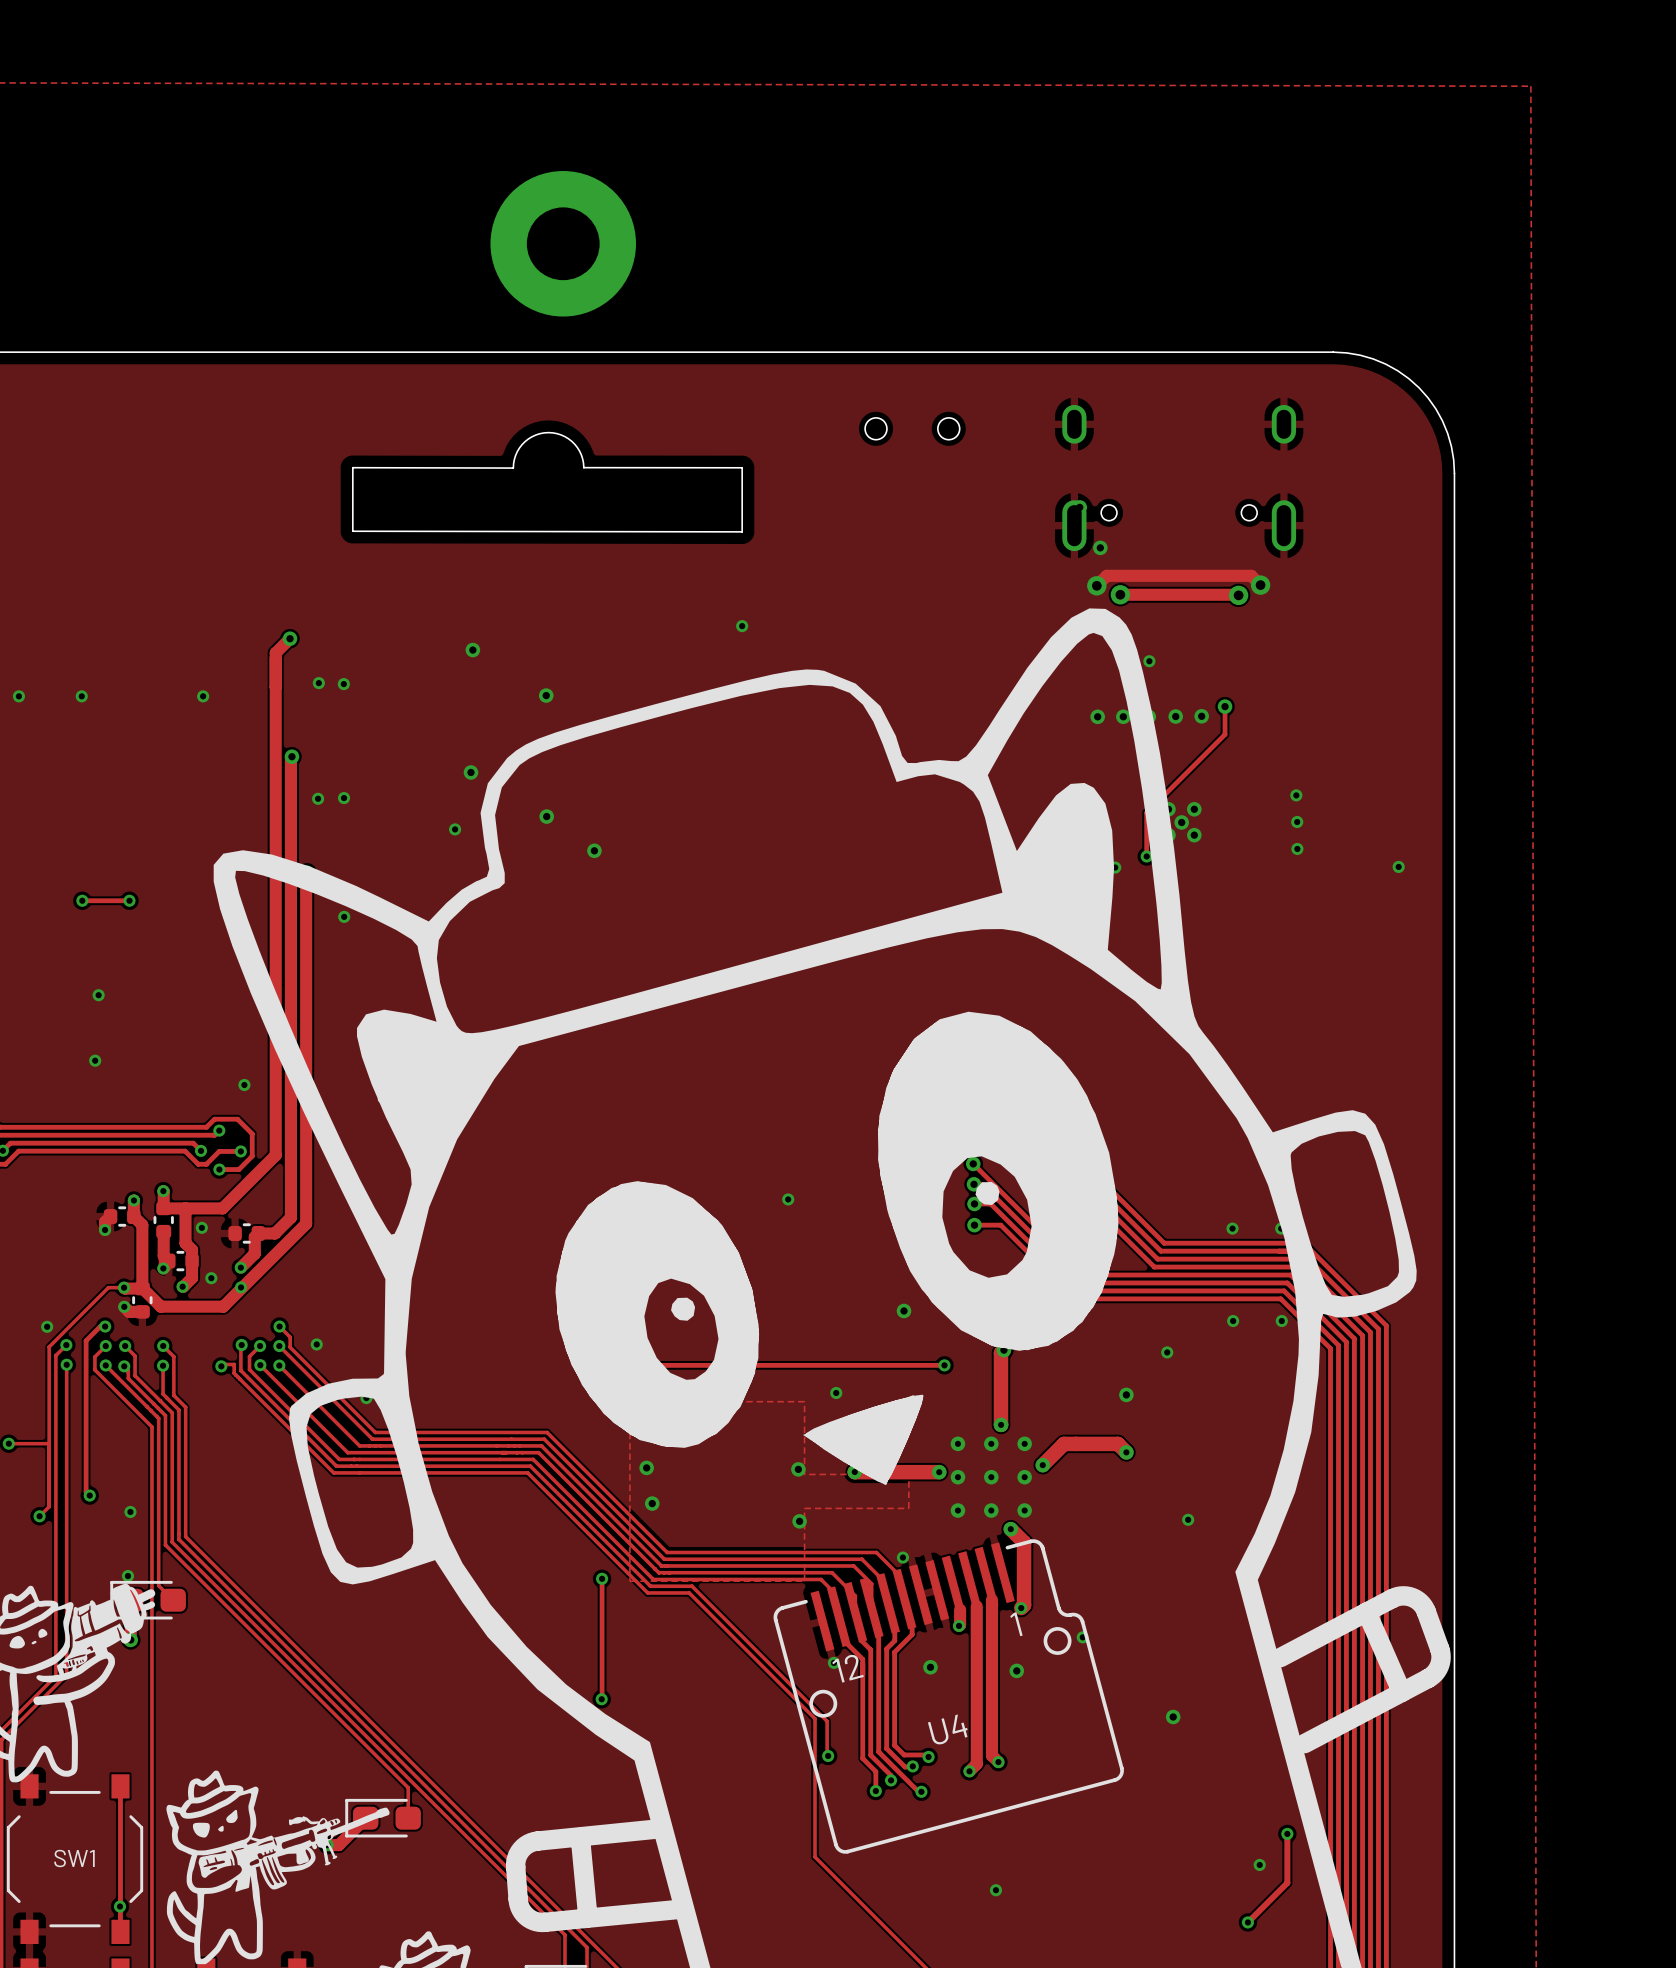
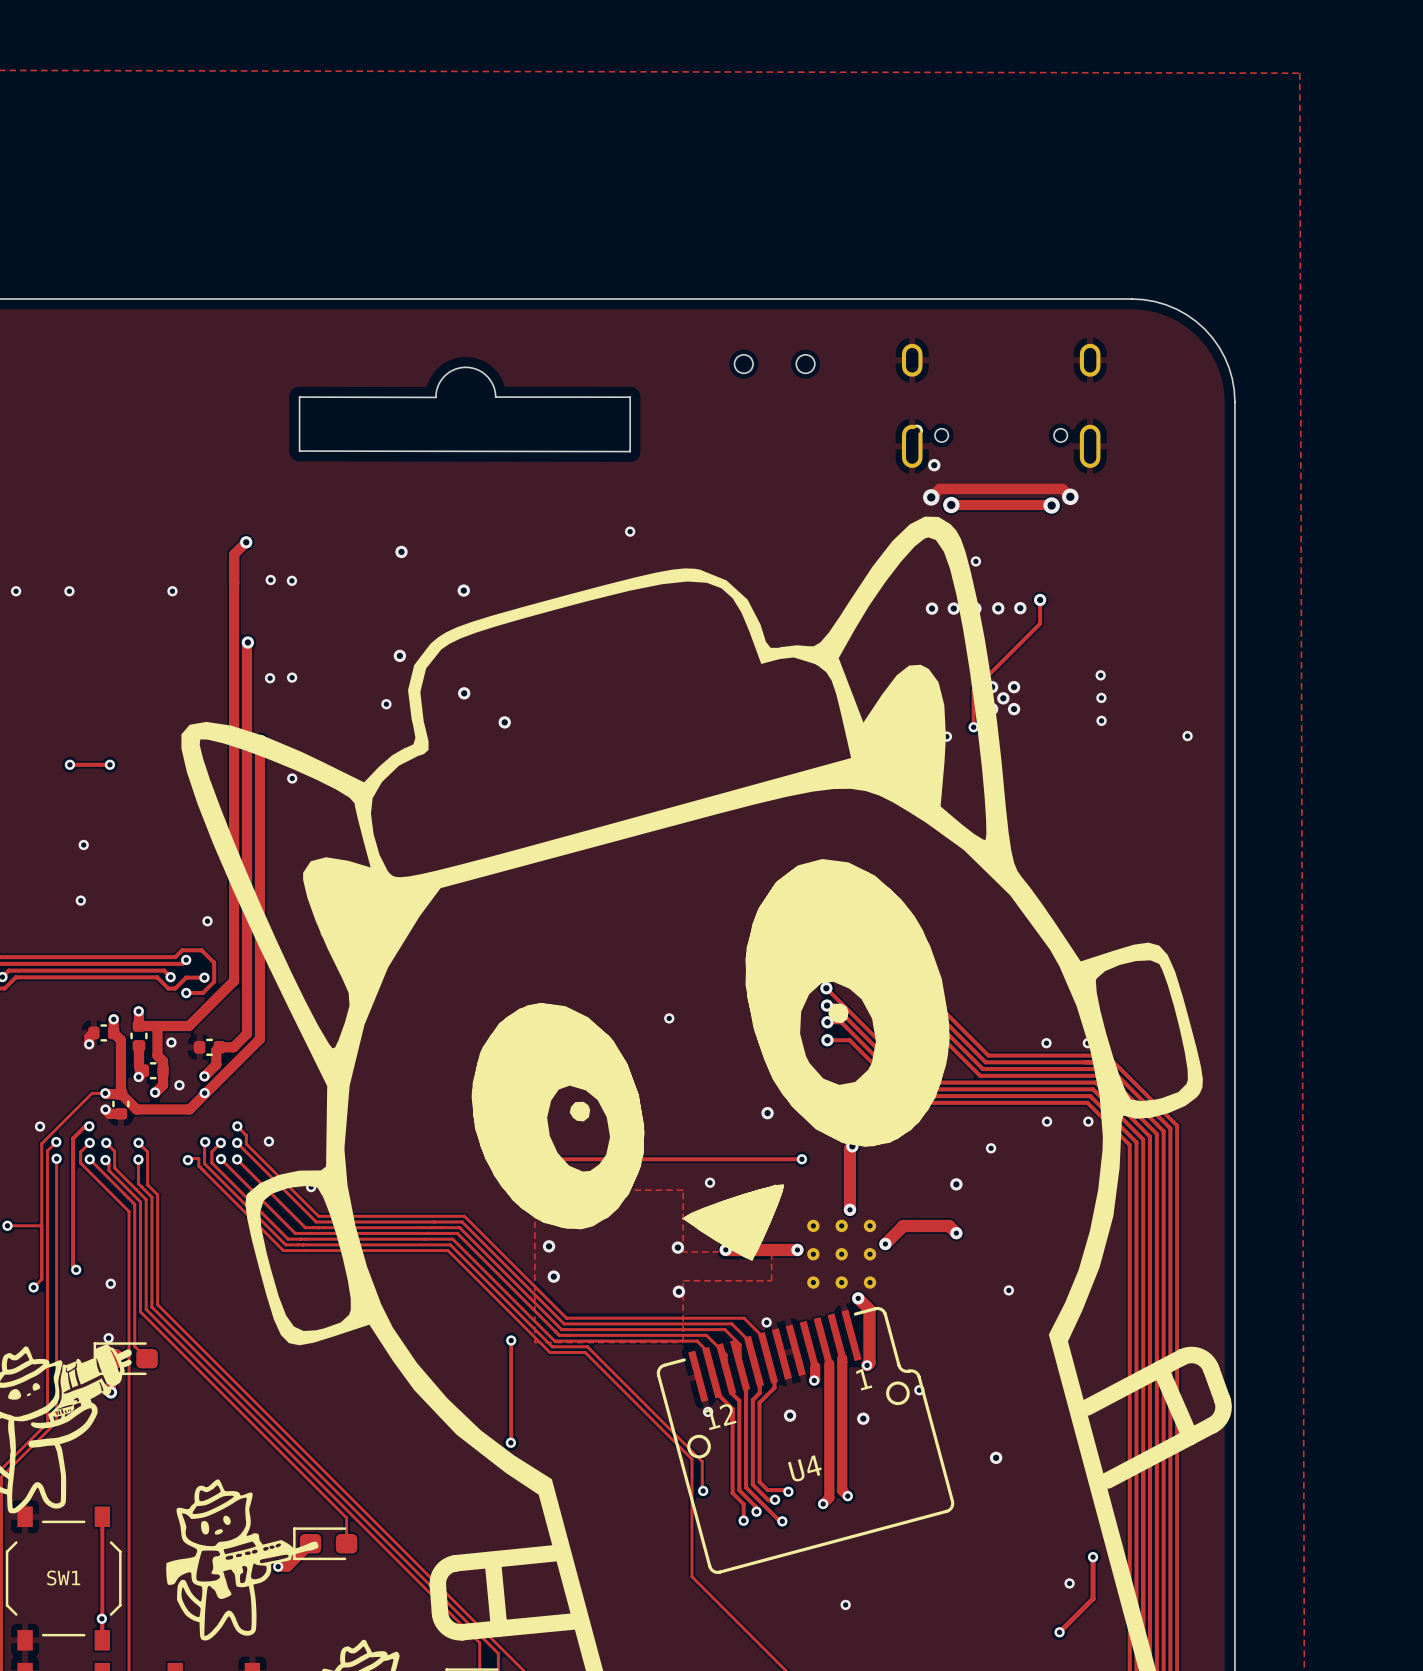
part: (563, 243) -> none
drawing: none -> [166, 1479, 319, 1641]
drawing: [166, 1770, 390, 1965] -> none

